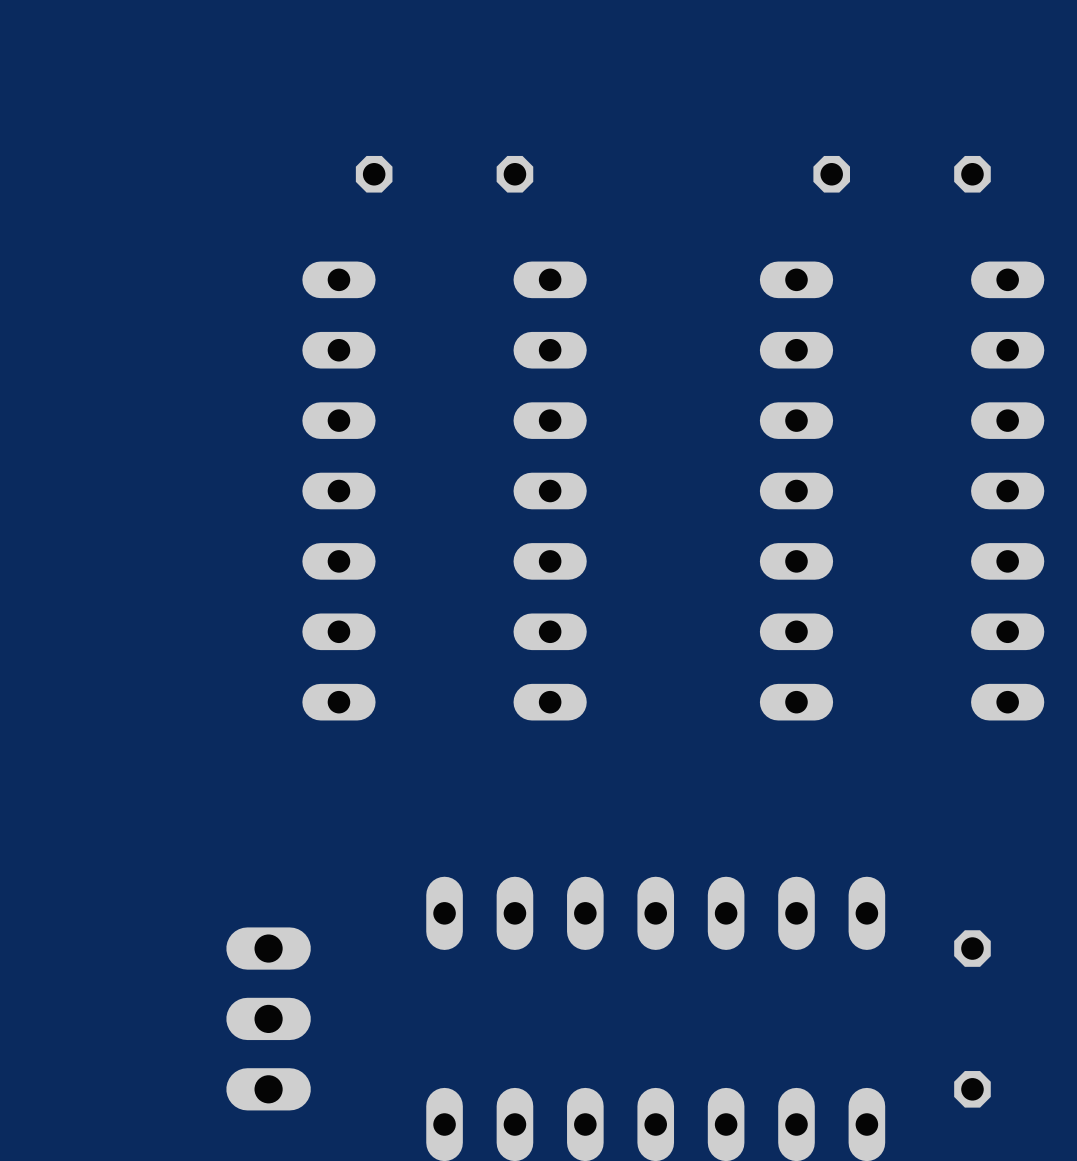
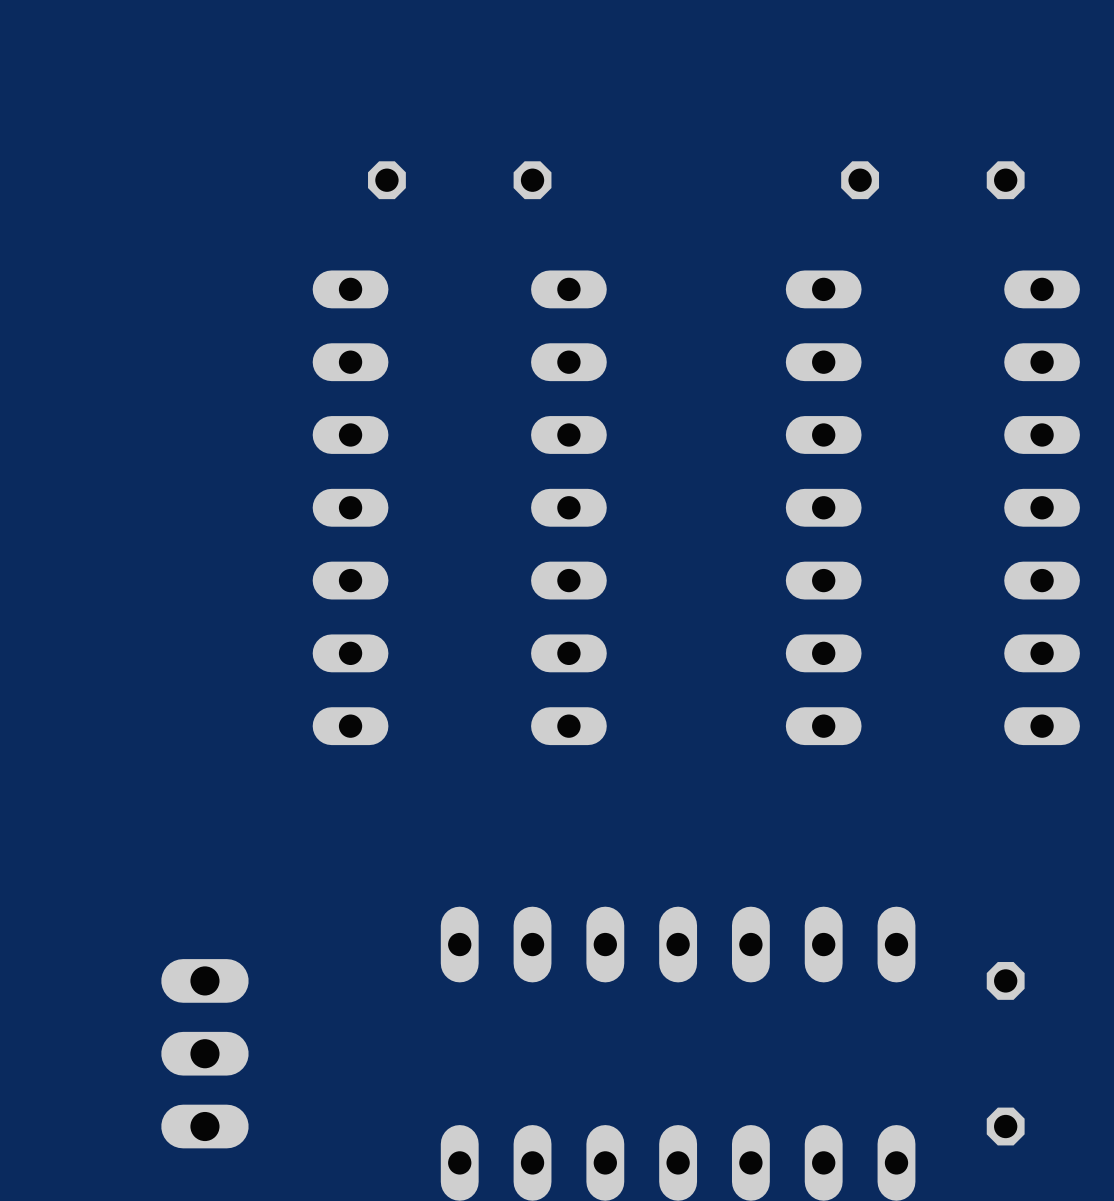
part position: (268, 1018) -> (204, 1053)

